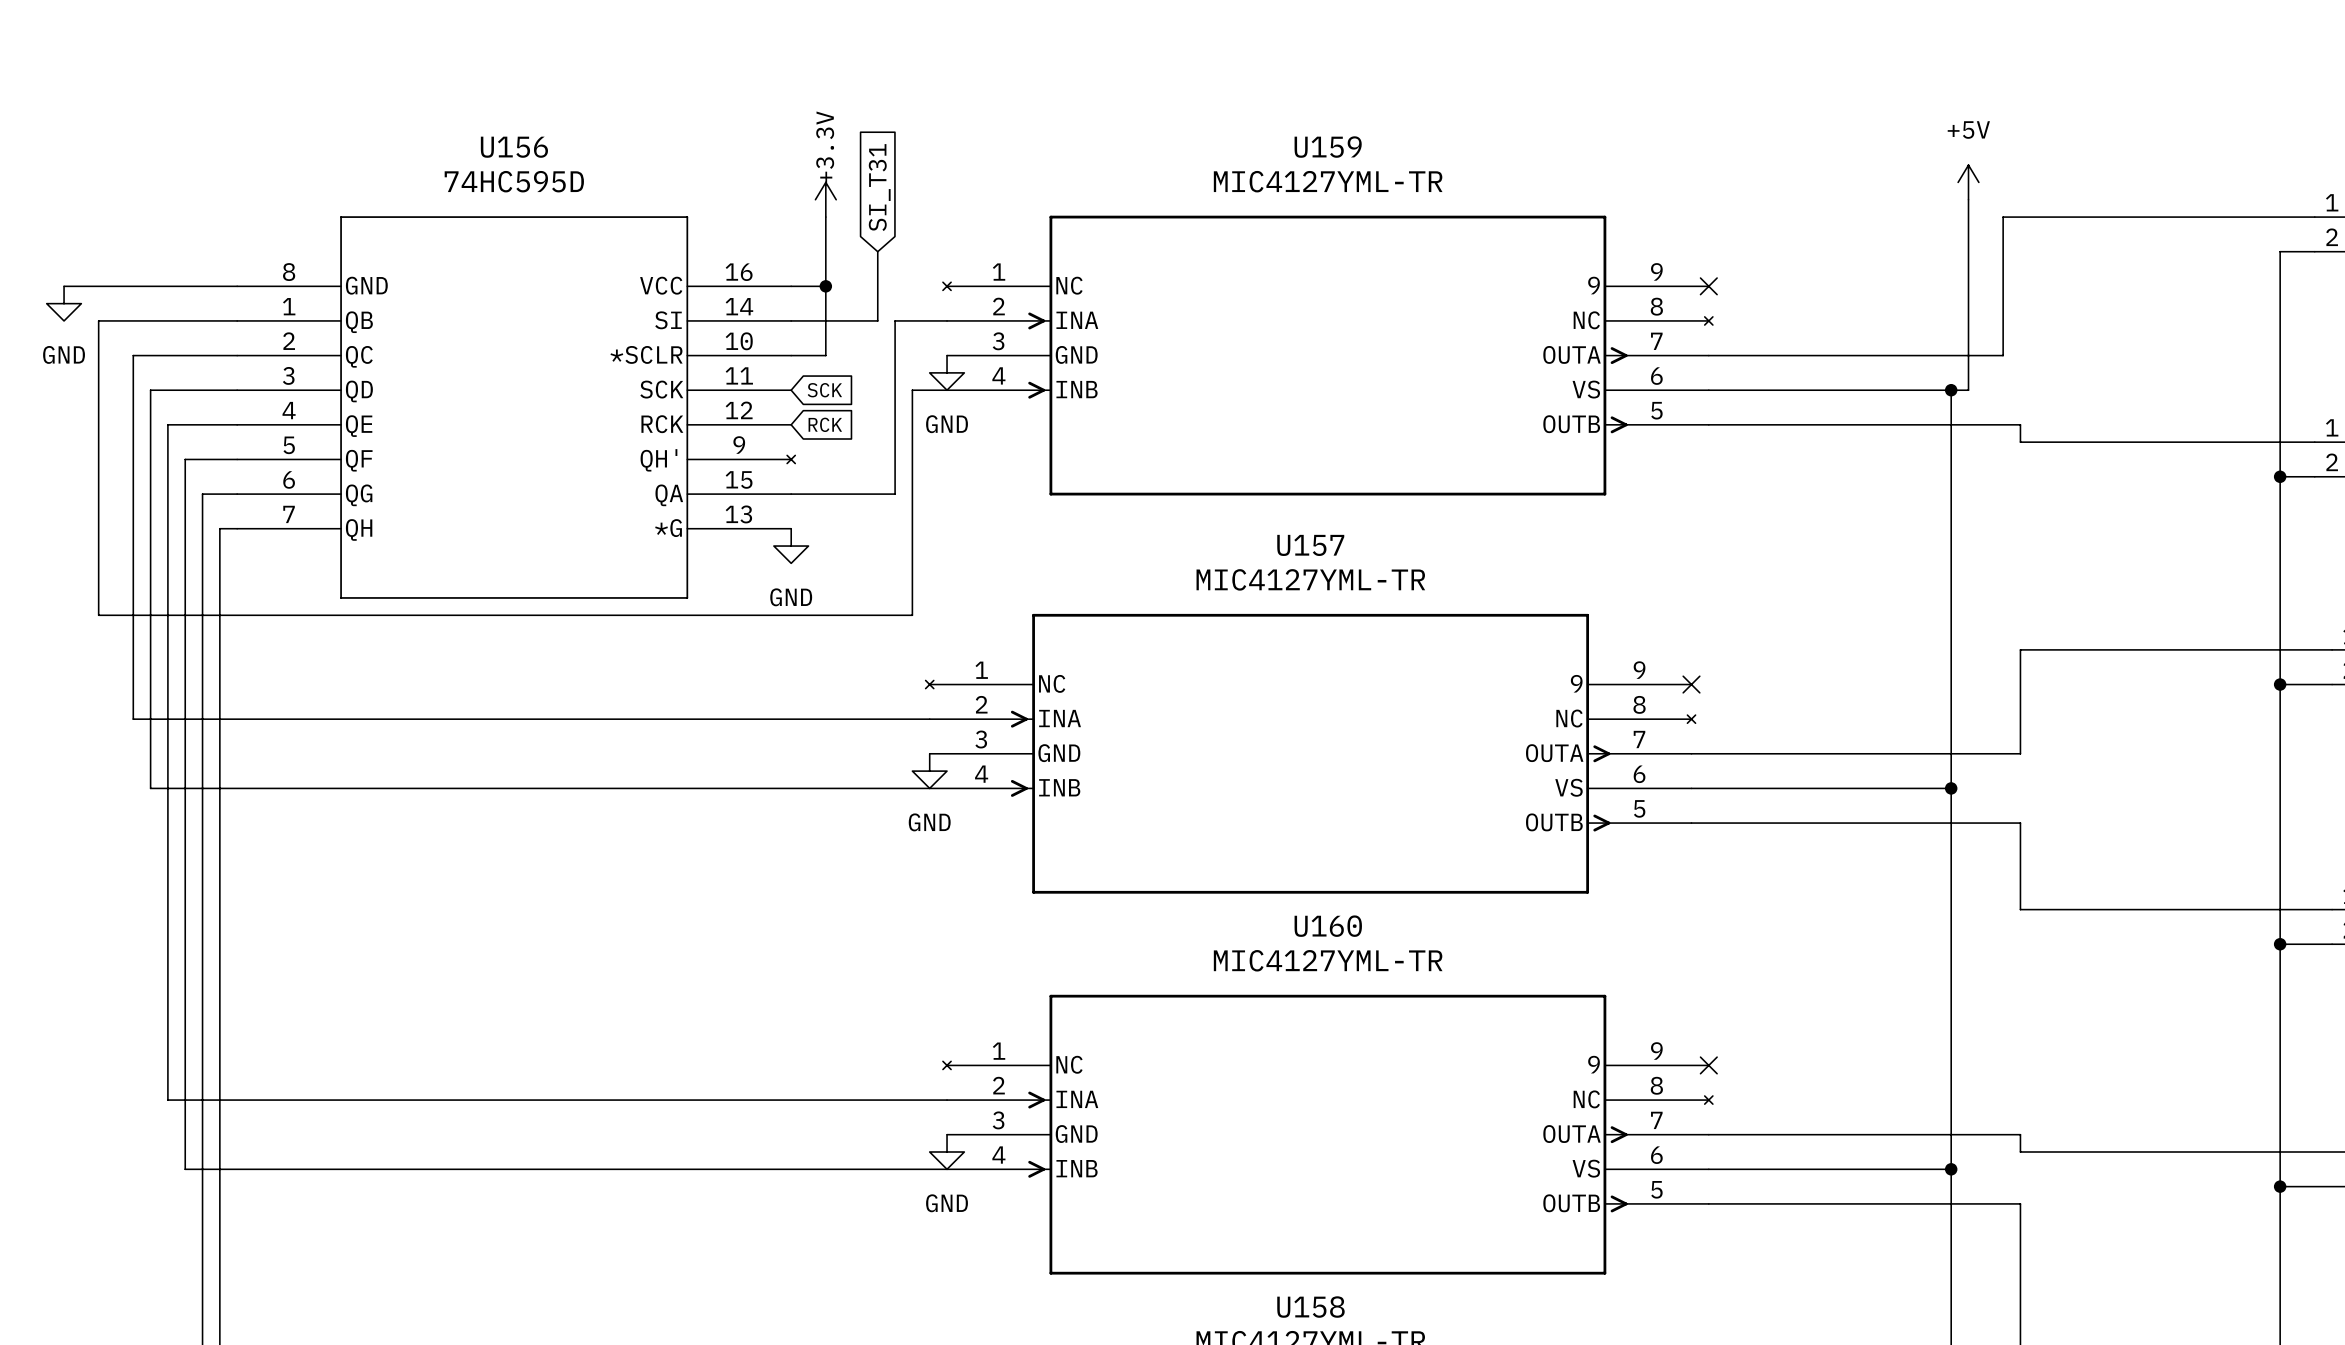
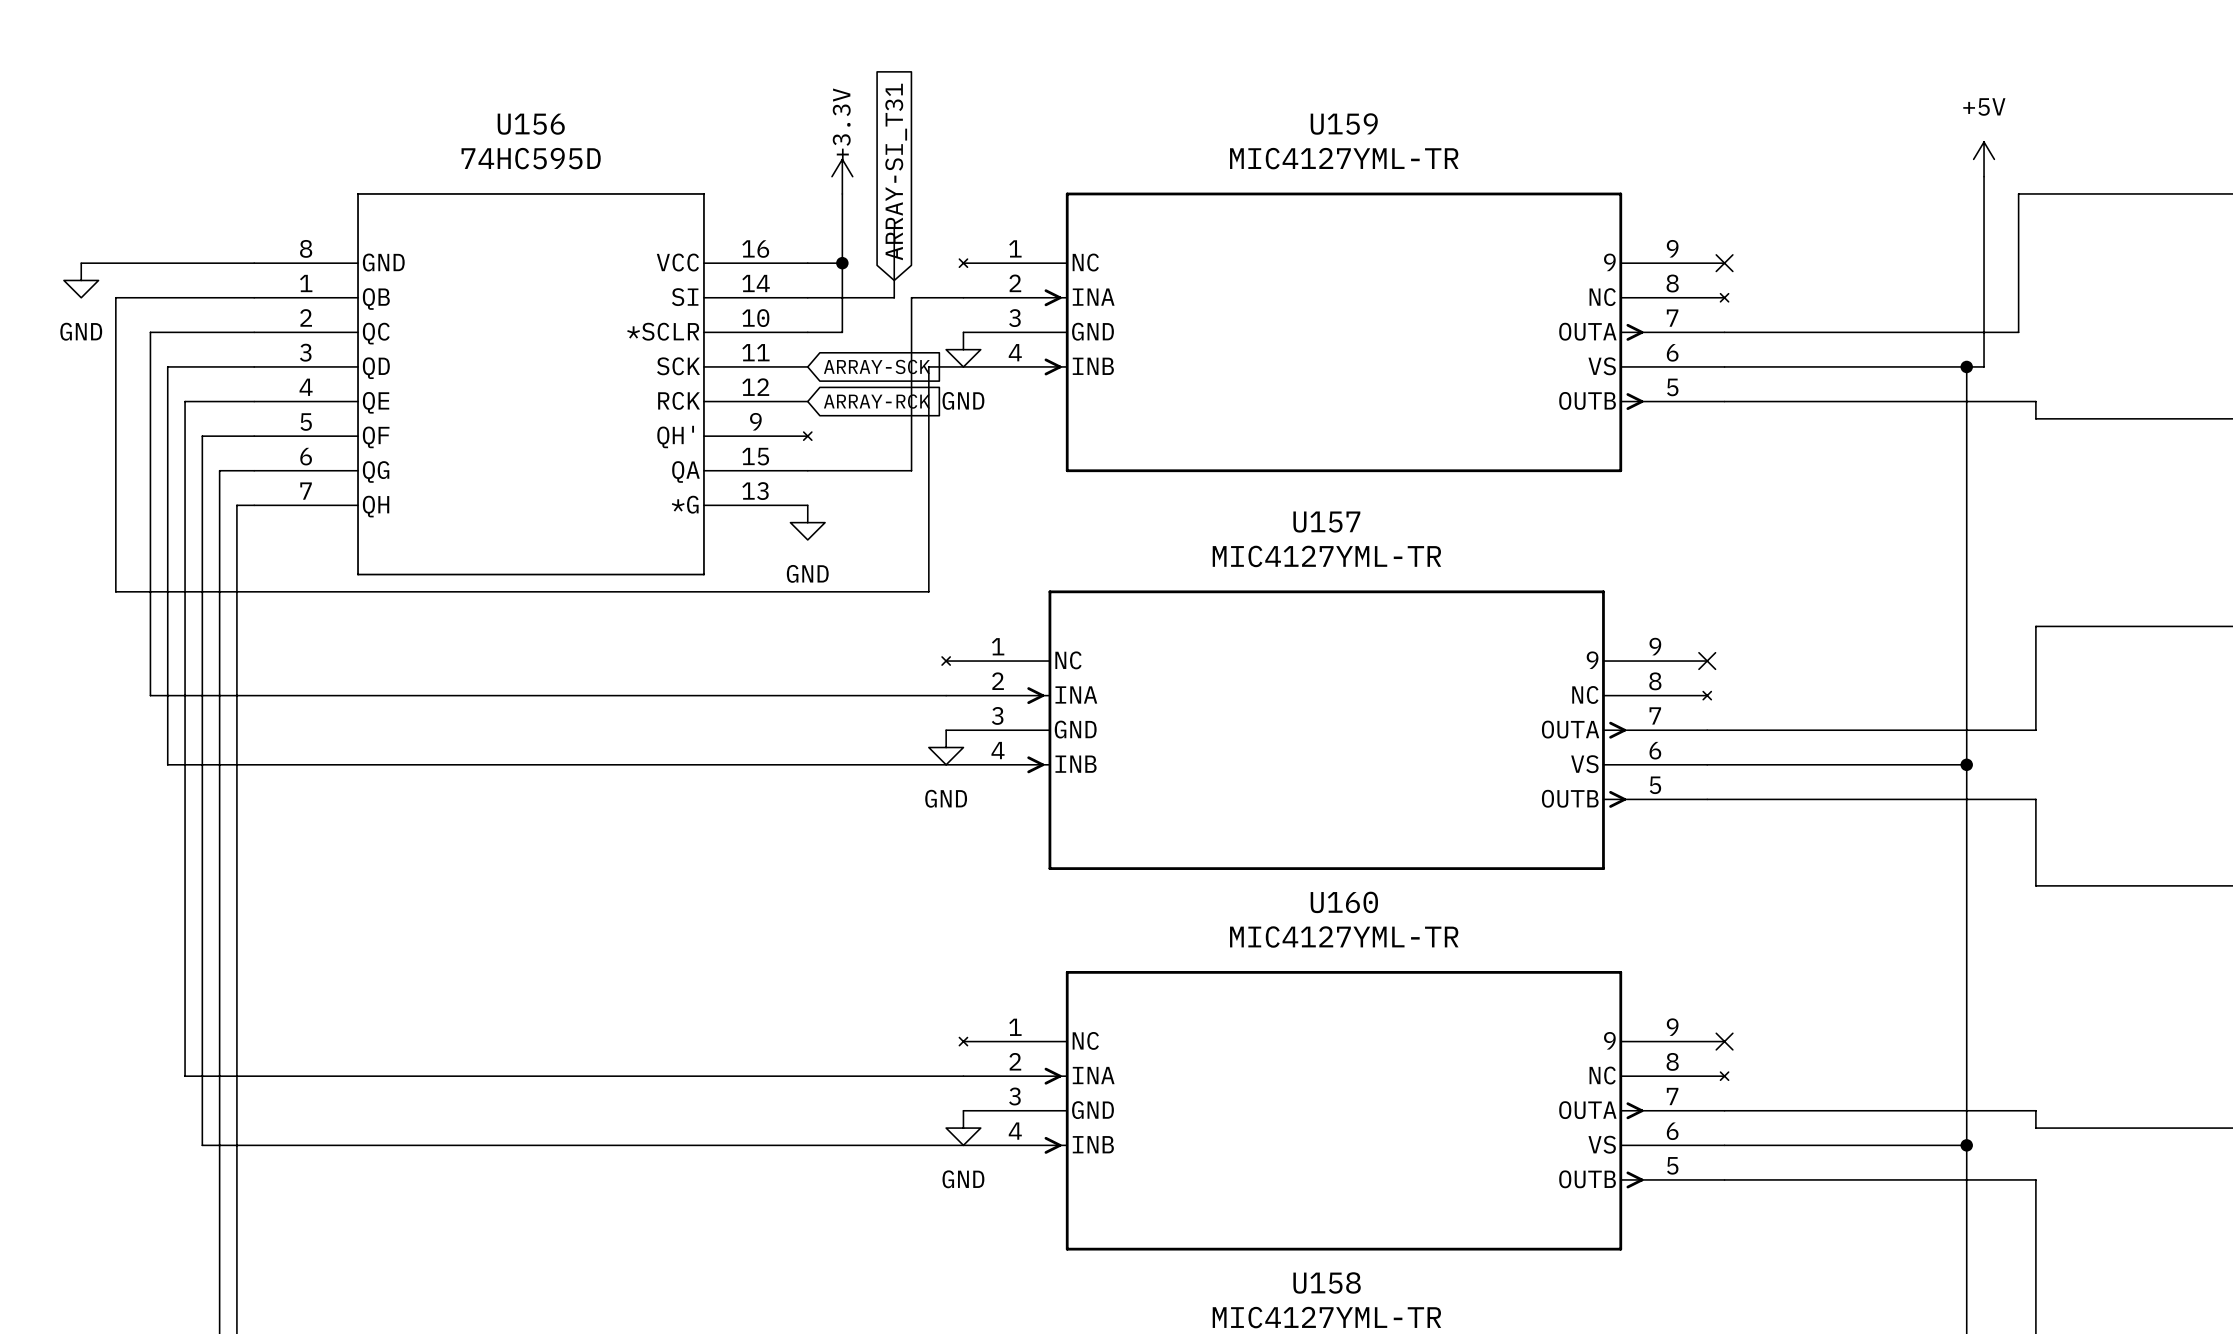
global label: SI_T31 (879, 187) -> ARRAY-SI_T31 (896, 171)
global label: SCK (824, 390) -> ARRAY-SCK (876, 366)
global label: RCK (825, 424) -> ARRAY-RCK (876, 401)

